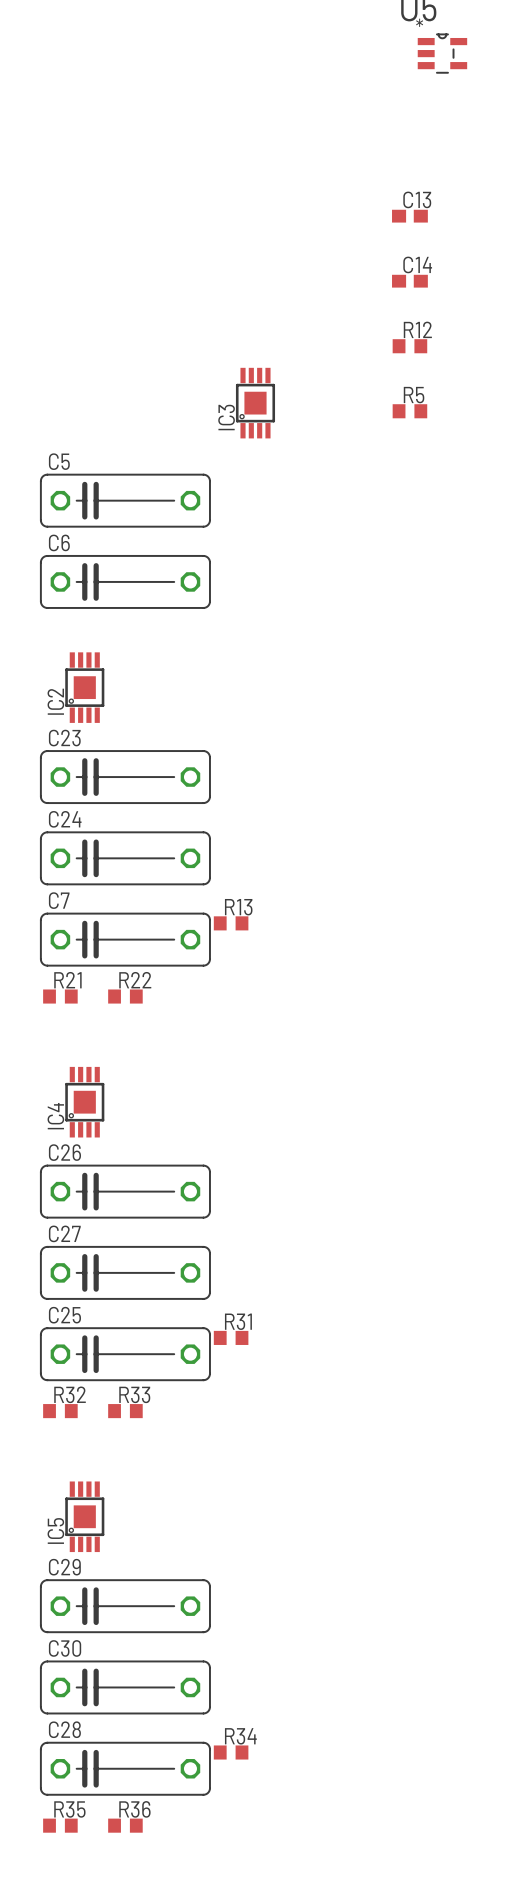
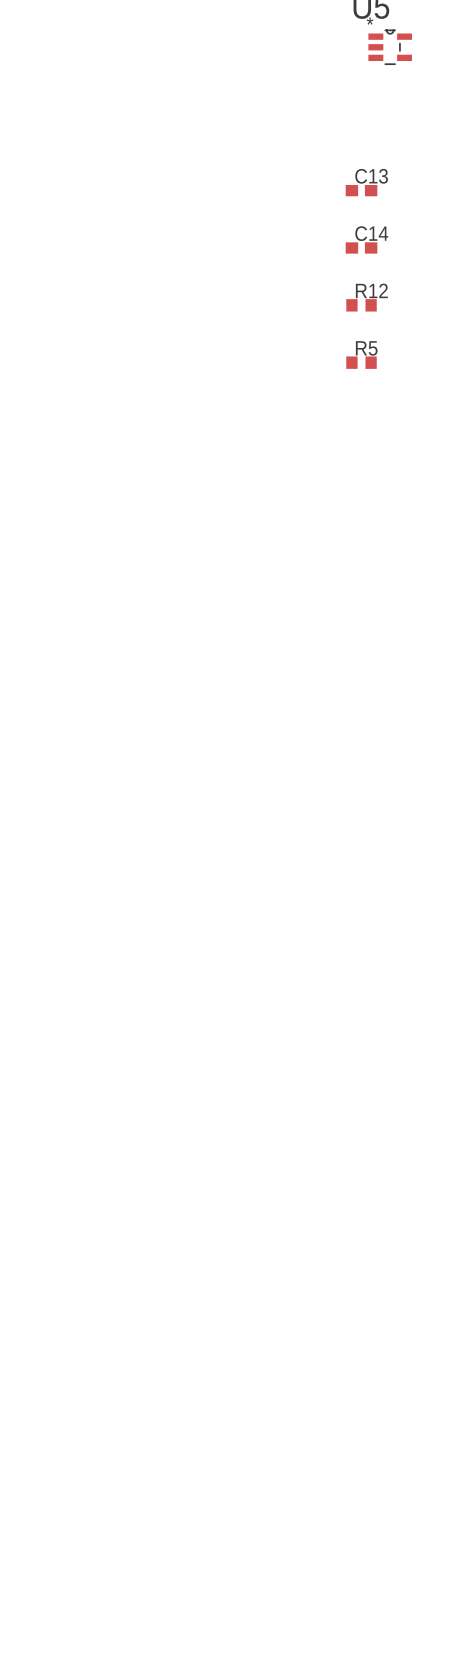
IC3: (255, 403) -> none
C5: (125, 500) -> none
C6: (125, 581) -> none
IC2: (84, 687) -> none
C23: (125, 777) -> none
C24: (125, 858) -> none
R13: (231, 923) -> none
C7: (125, 939) -> none
R21: (60, 996) -> none
R22: (125, 996) -> none
IC4: (84, 1102) -> none
C26: (125, 1191) -> none
C27: (125, 1272) -> none
R31: (231, 1337) -> none
C25: (125, 1354) -> none
R32: (60, 1411) -> none
R33: (125, 1411) -> none
IC5: (84, 1516) -> none
C29: (125, 1606) -> none
C30: (125, 1687) -> none
R34: (231, 1752) -> none
C28: (125, 1768) -> none
R35: (60, 1825) -> none
R36: (125, 1825) -> none

